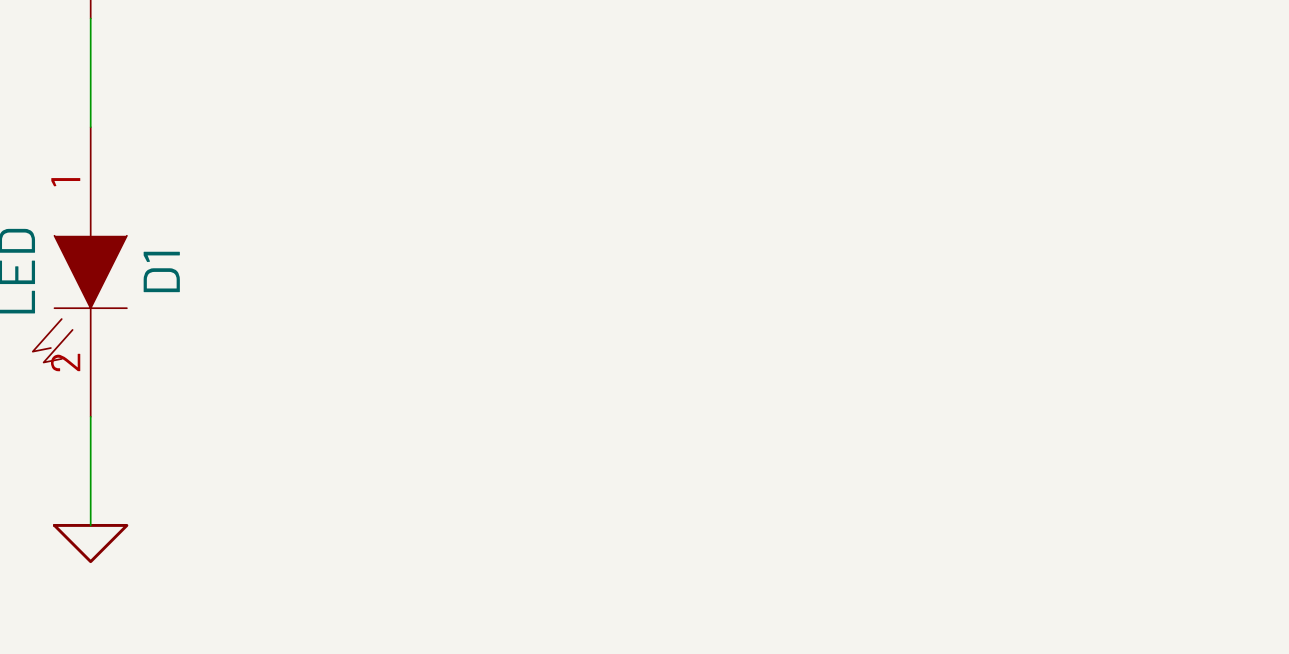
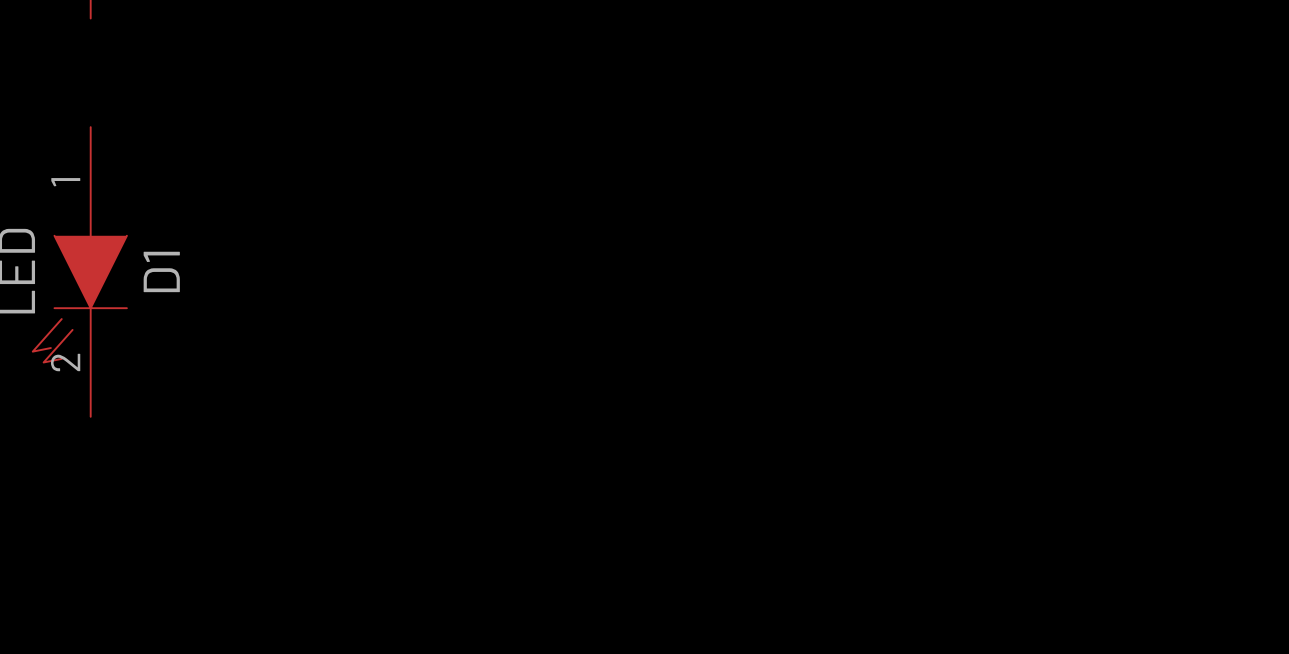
wire: (90, 18) (90, 127) -> none
wire: (90, 416) (90, 525) -> none
power symbol: (90, 543) -> none

